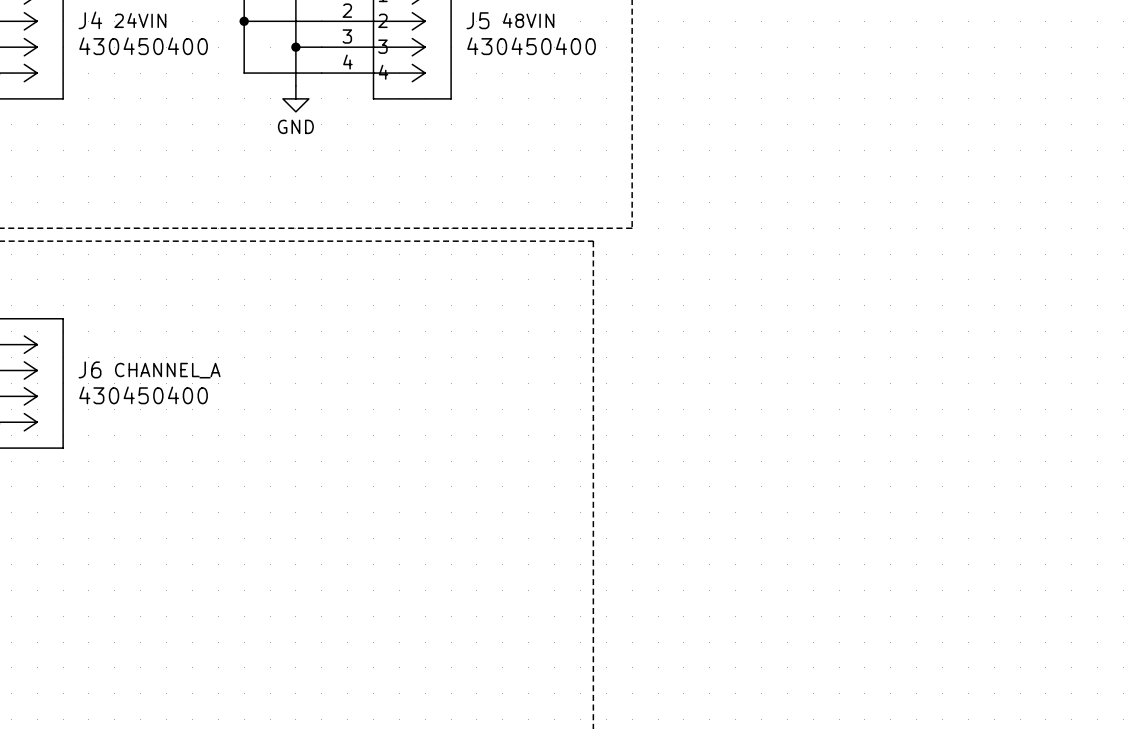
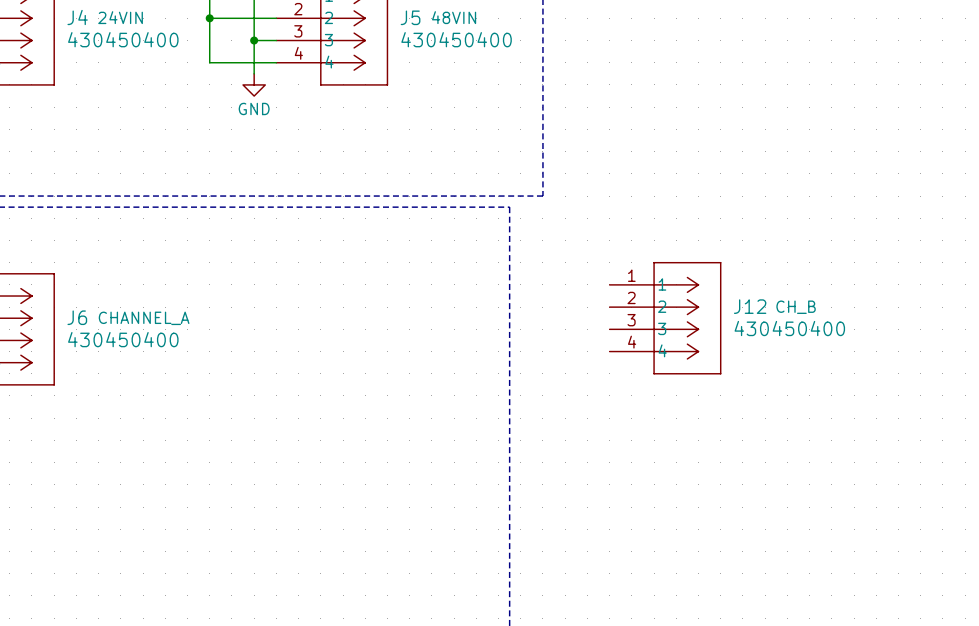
J12: none -> 430450400 (665, 318)

